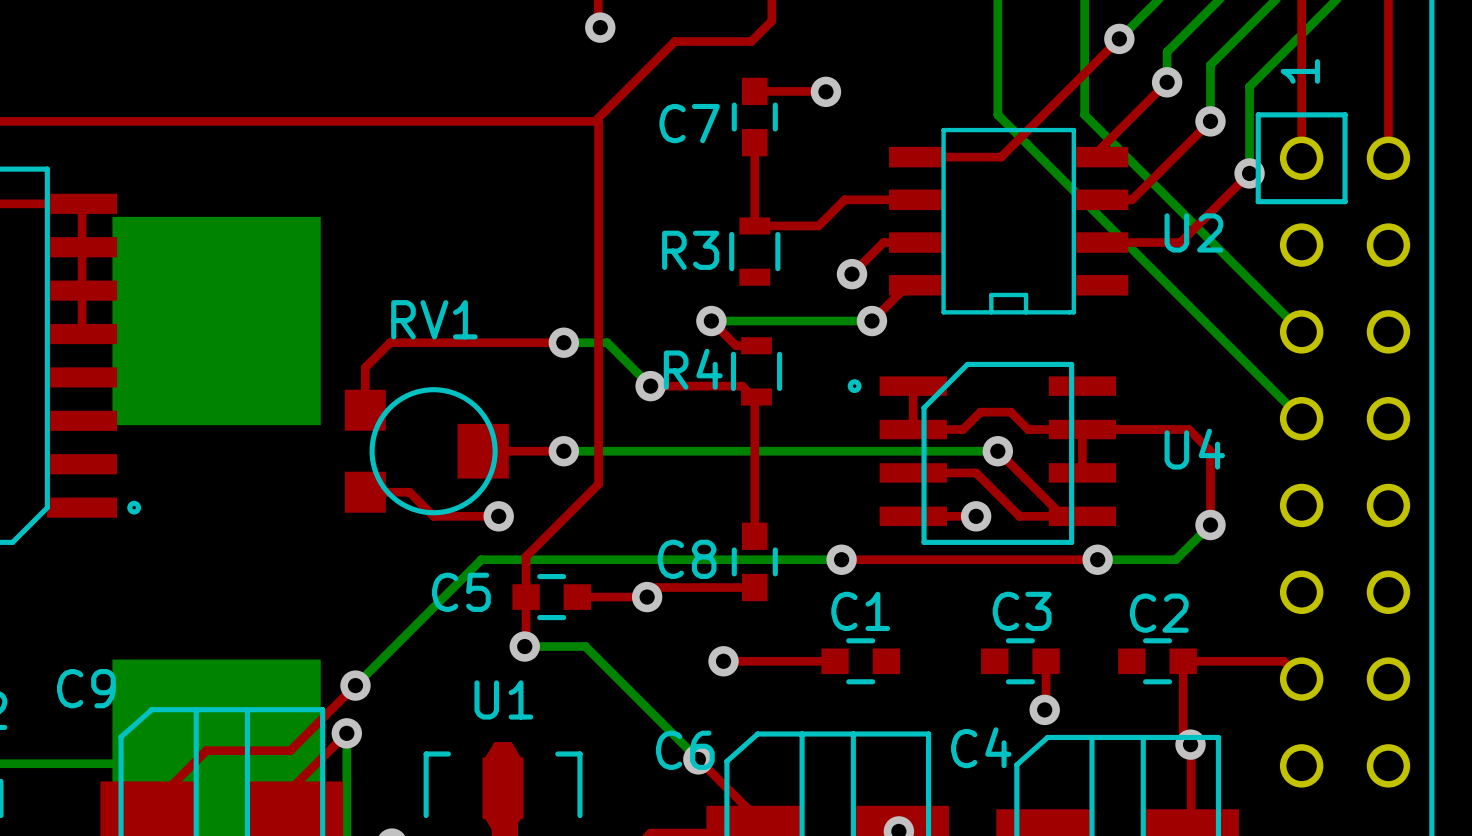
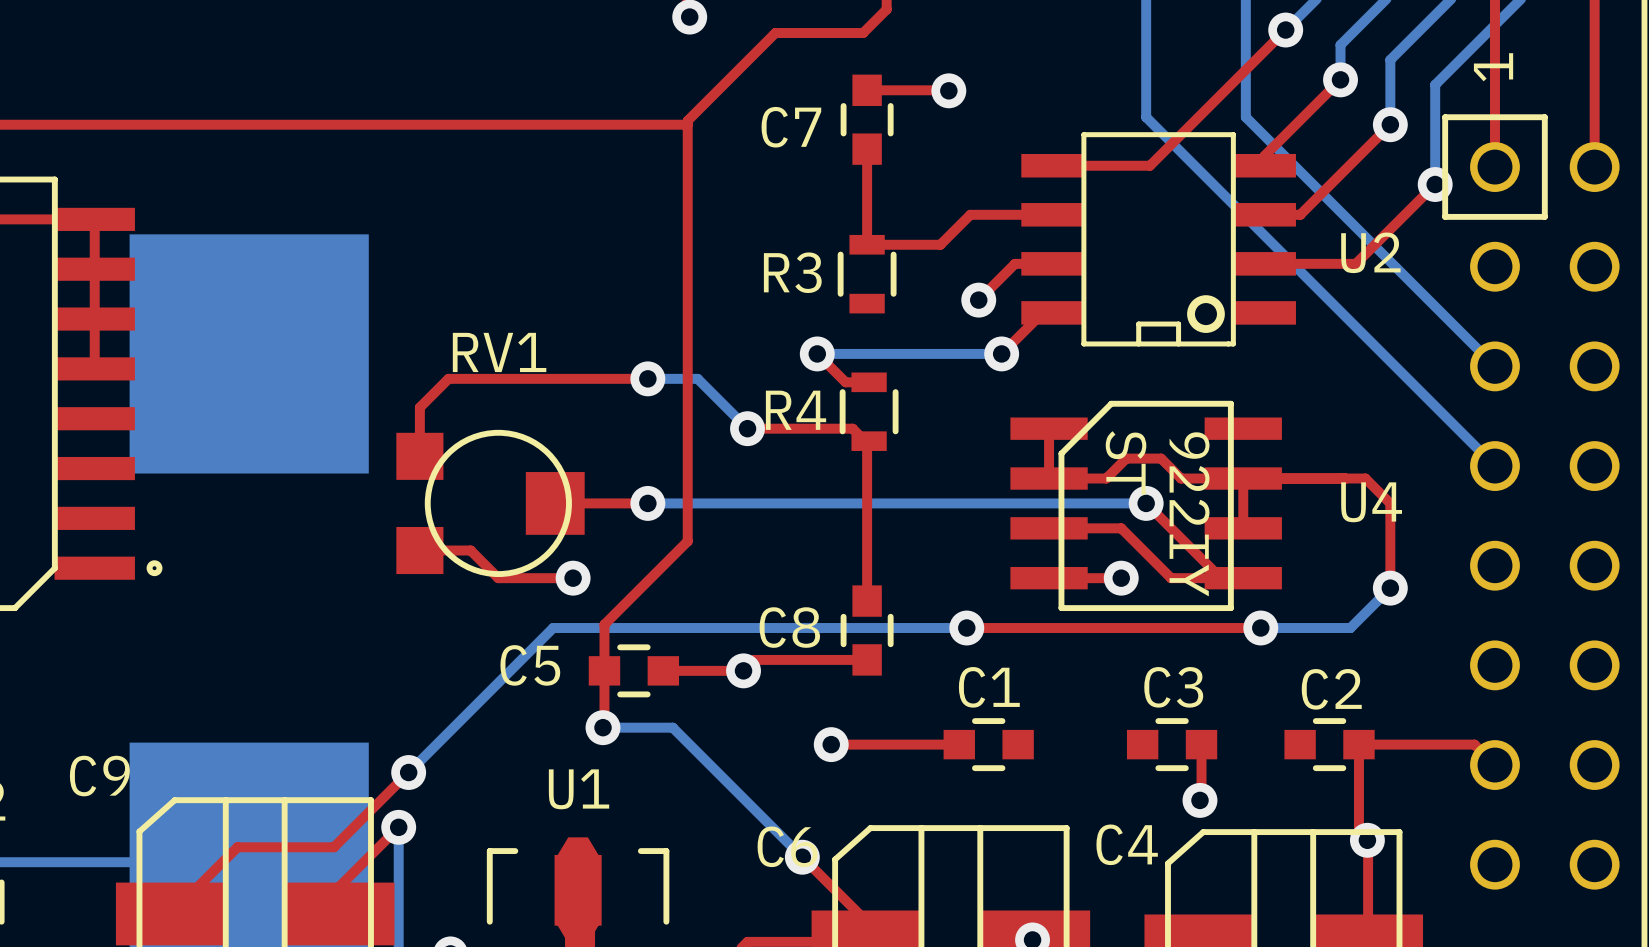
drawing: none -> [1187, 295, 1225, 333]
U4 footprint: [847, 361, 1117, 545] -> [1010, 400, 1282, 612]
text: none -> ST (1126, 462)
text: none -> 922IY (1189, 514)

